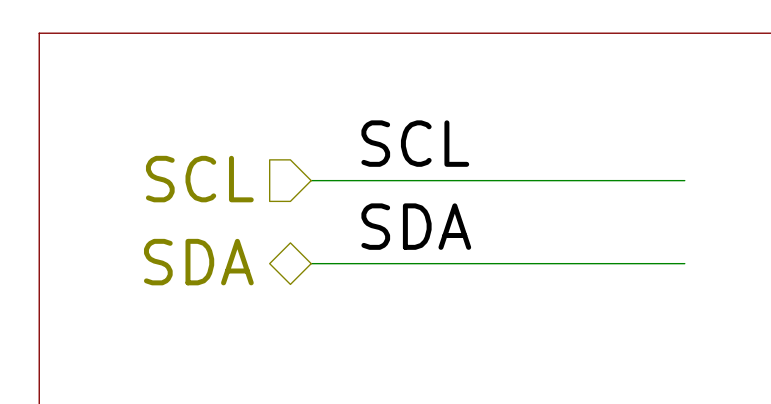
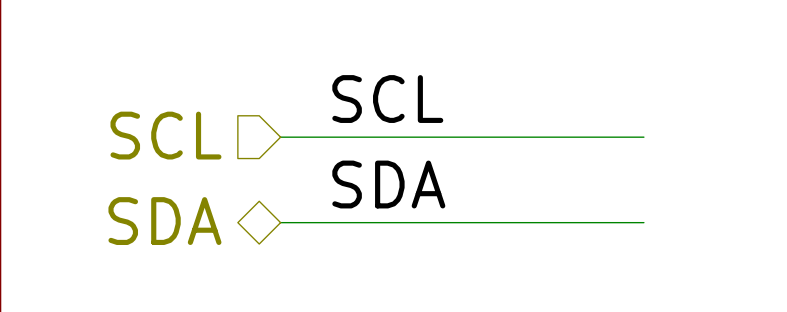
wire: (664, 180) (684, 180) -> none
wire: (664, 263) (684, 263) -> none

